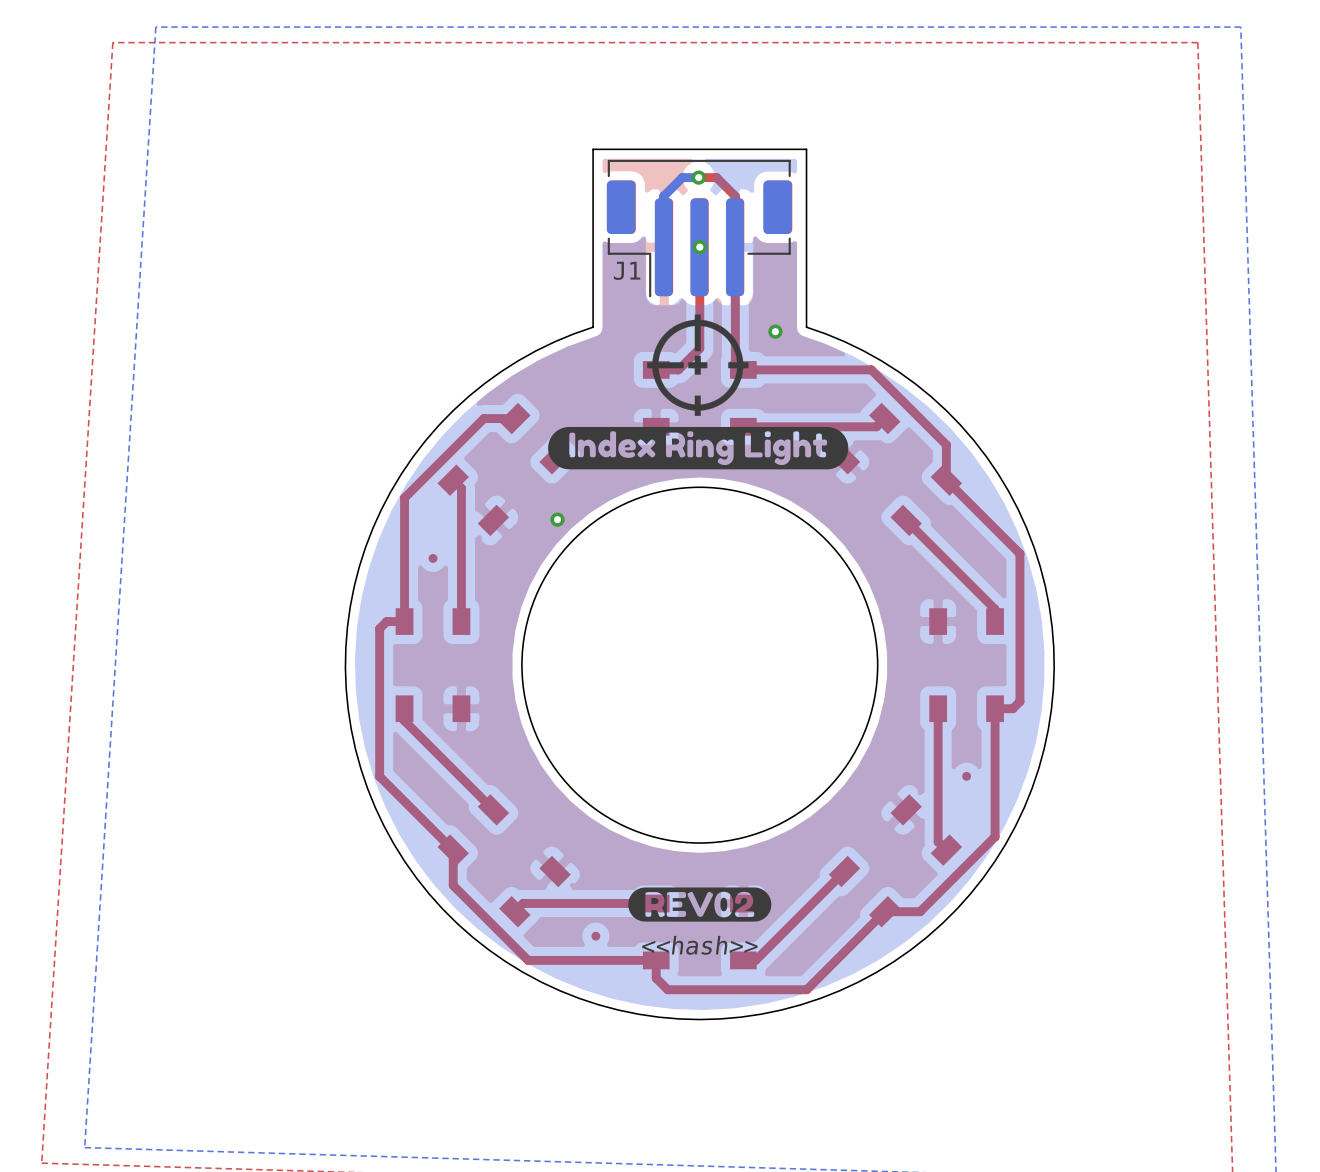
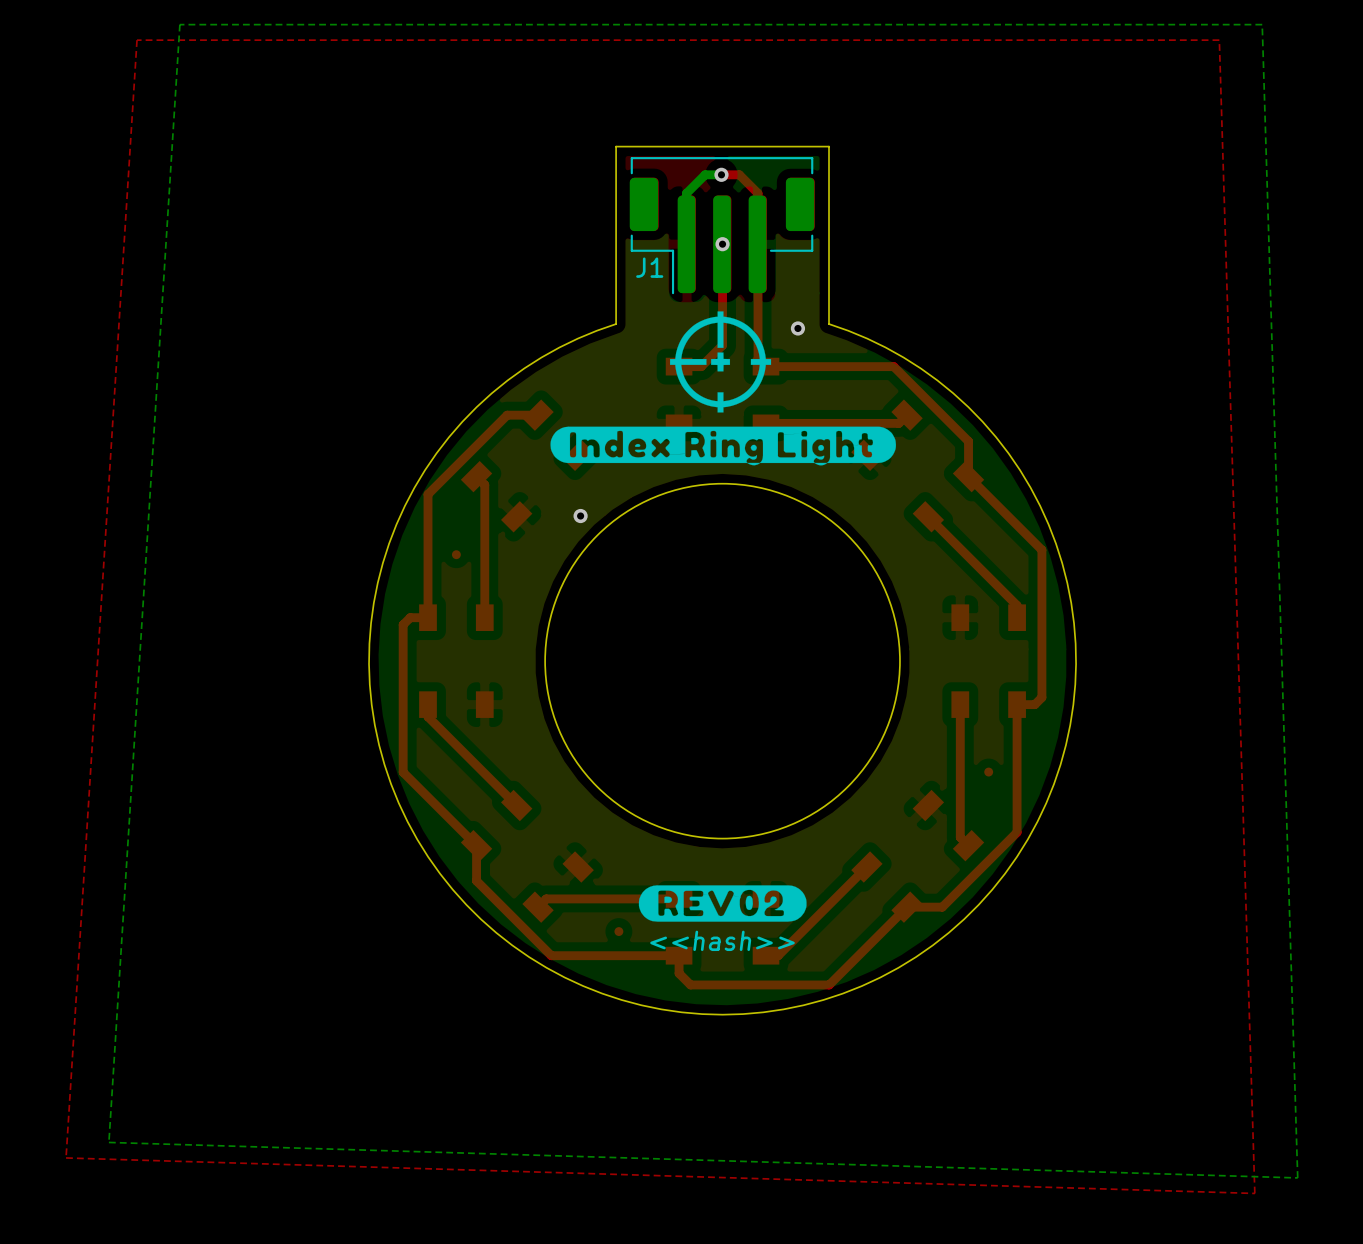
drawing shape: [548, 426, 849, 470] -> [550, 426, 896, 466]
drawing shape: [628, 887, 772, 922] -> [638, 885, 807, 922]

